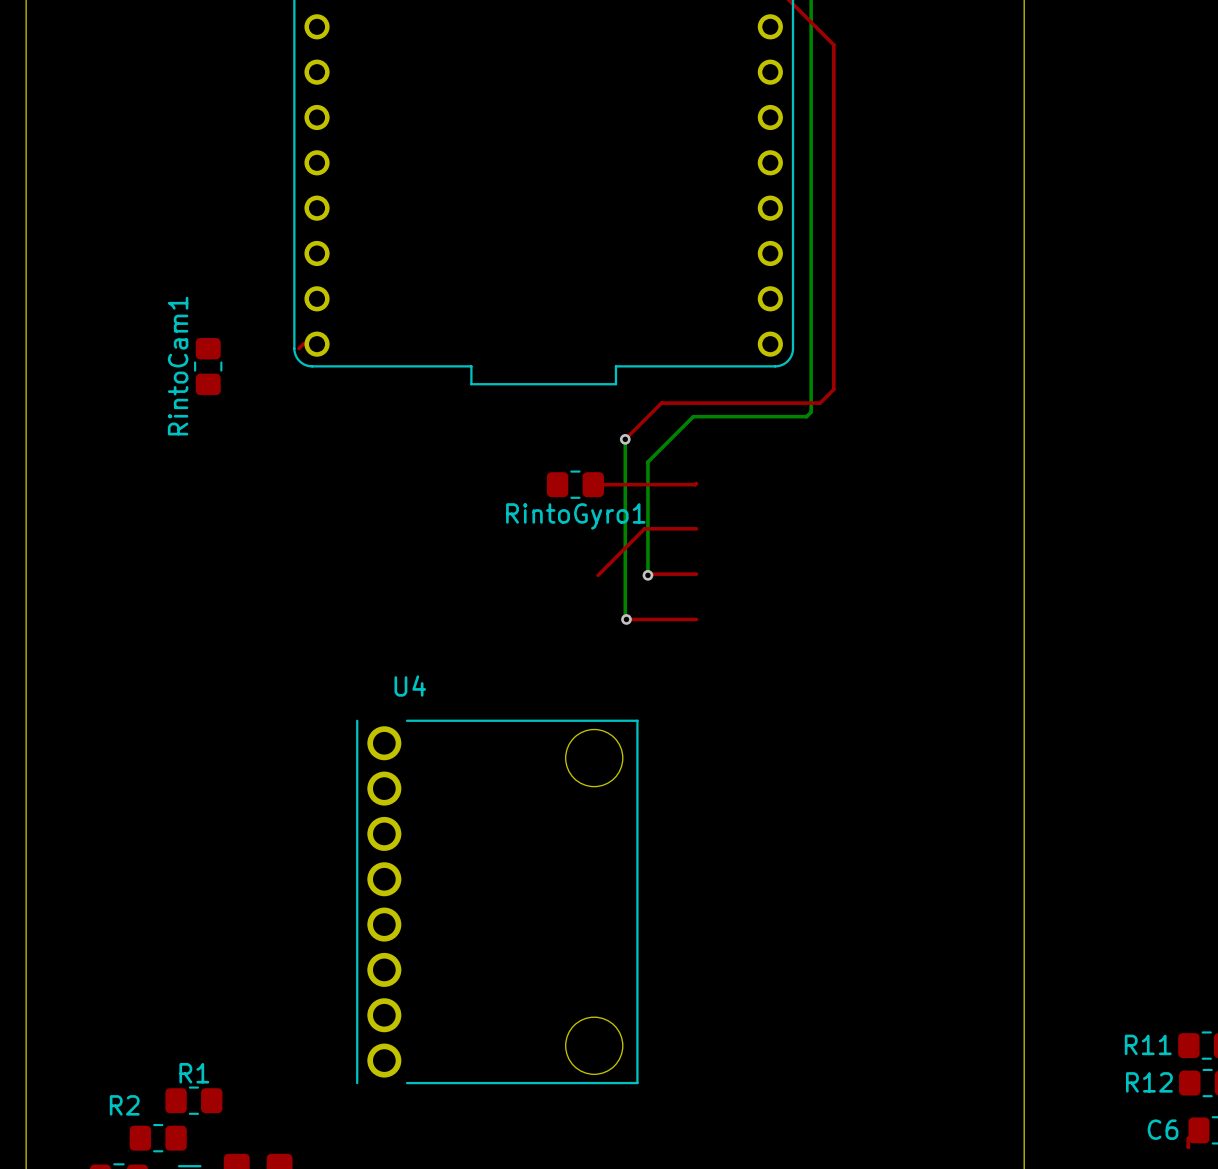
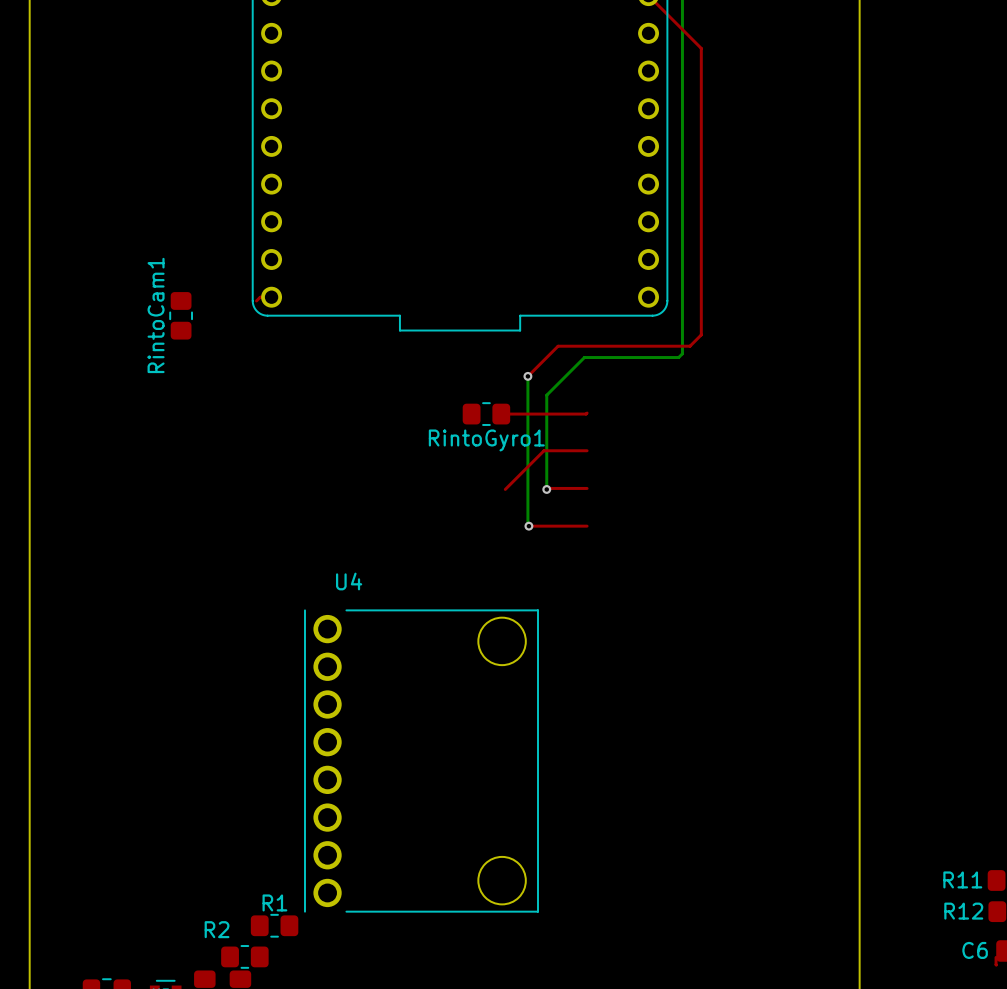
R1 position: (193, 1100) -> (274, 925)
R2 position: (158, 1138) -> (244, 956)

